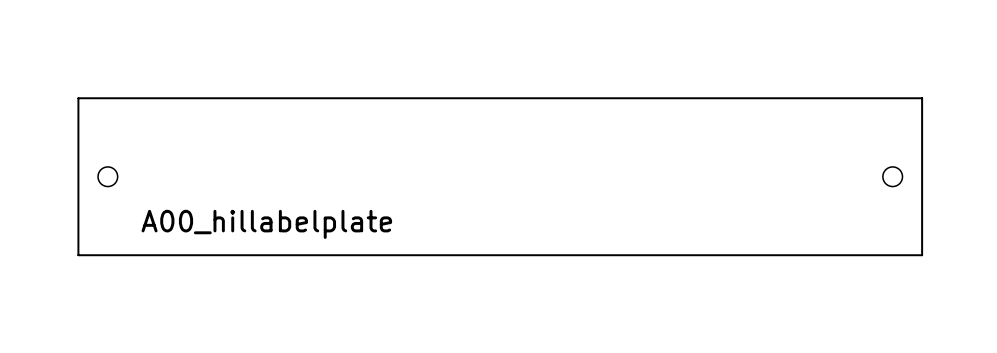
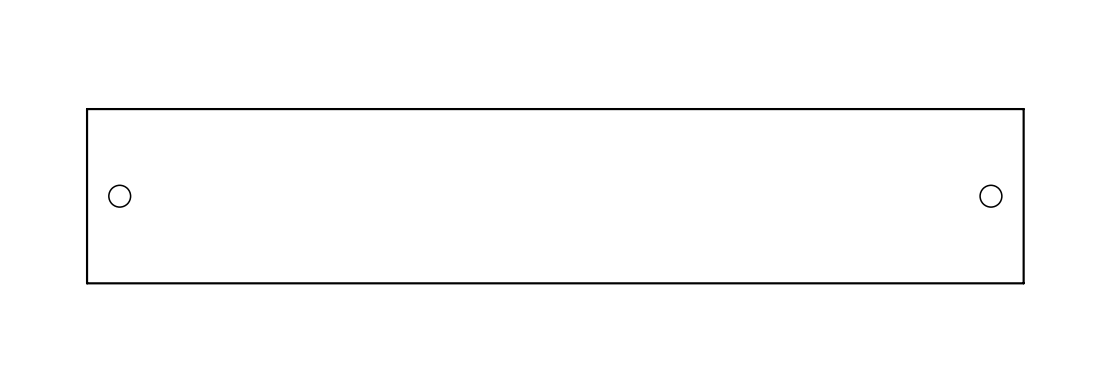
text: A00_hillabelplate (266, 224) -> none

